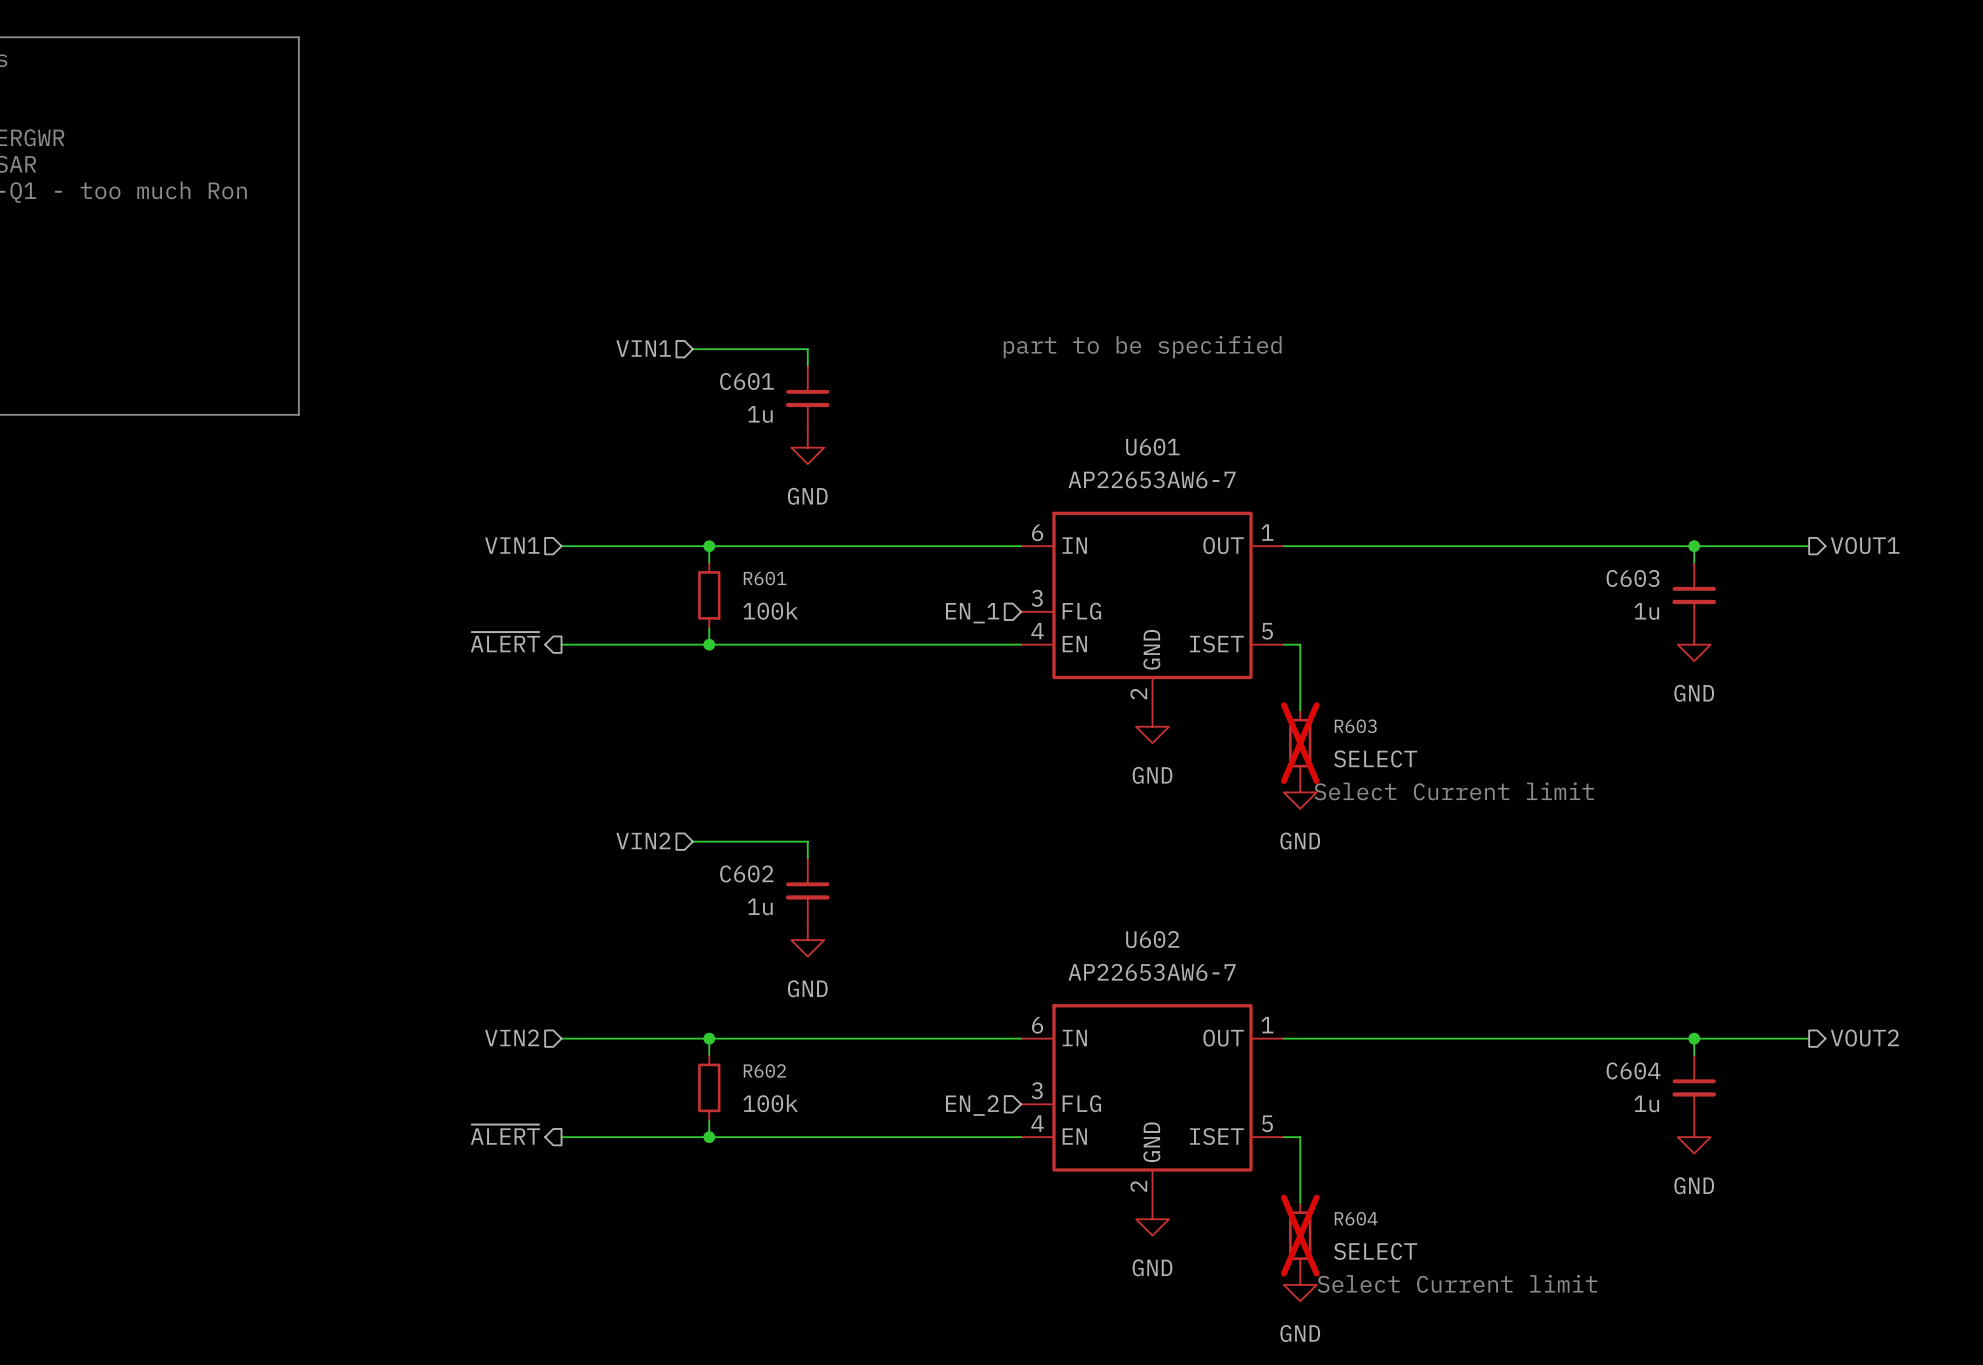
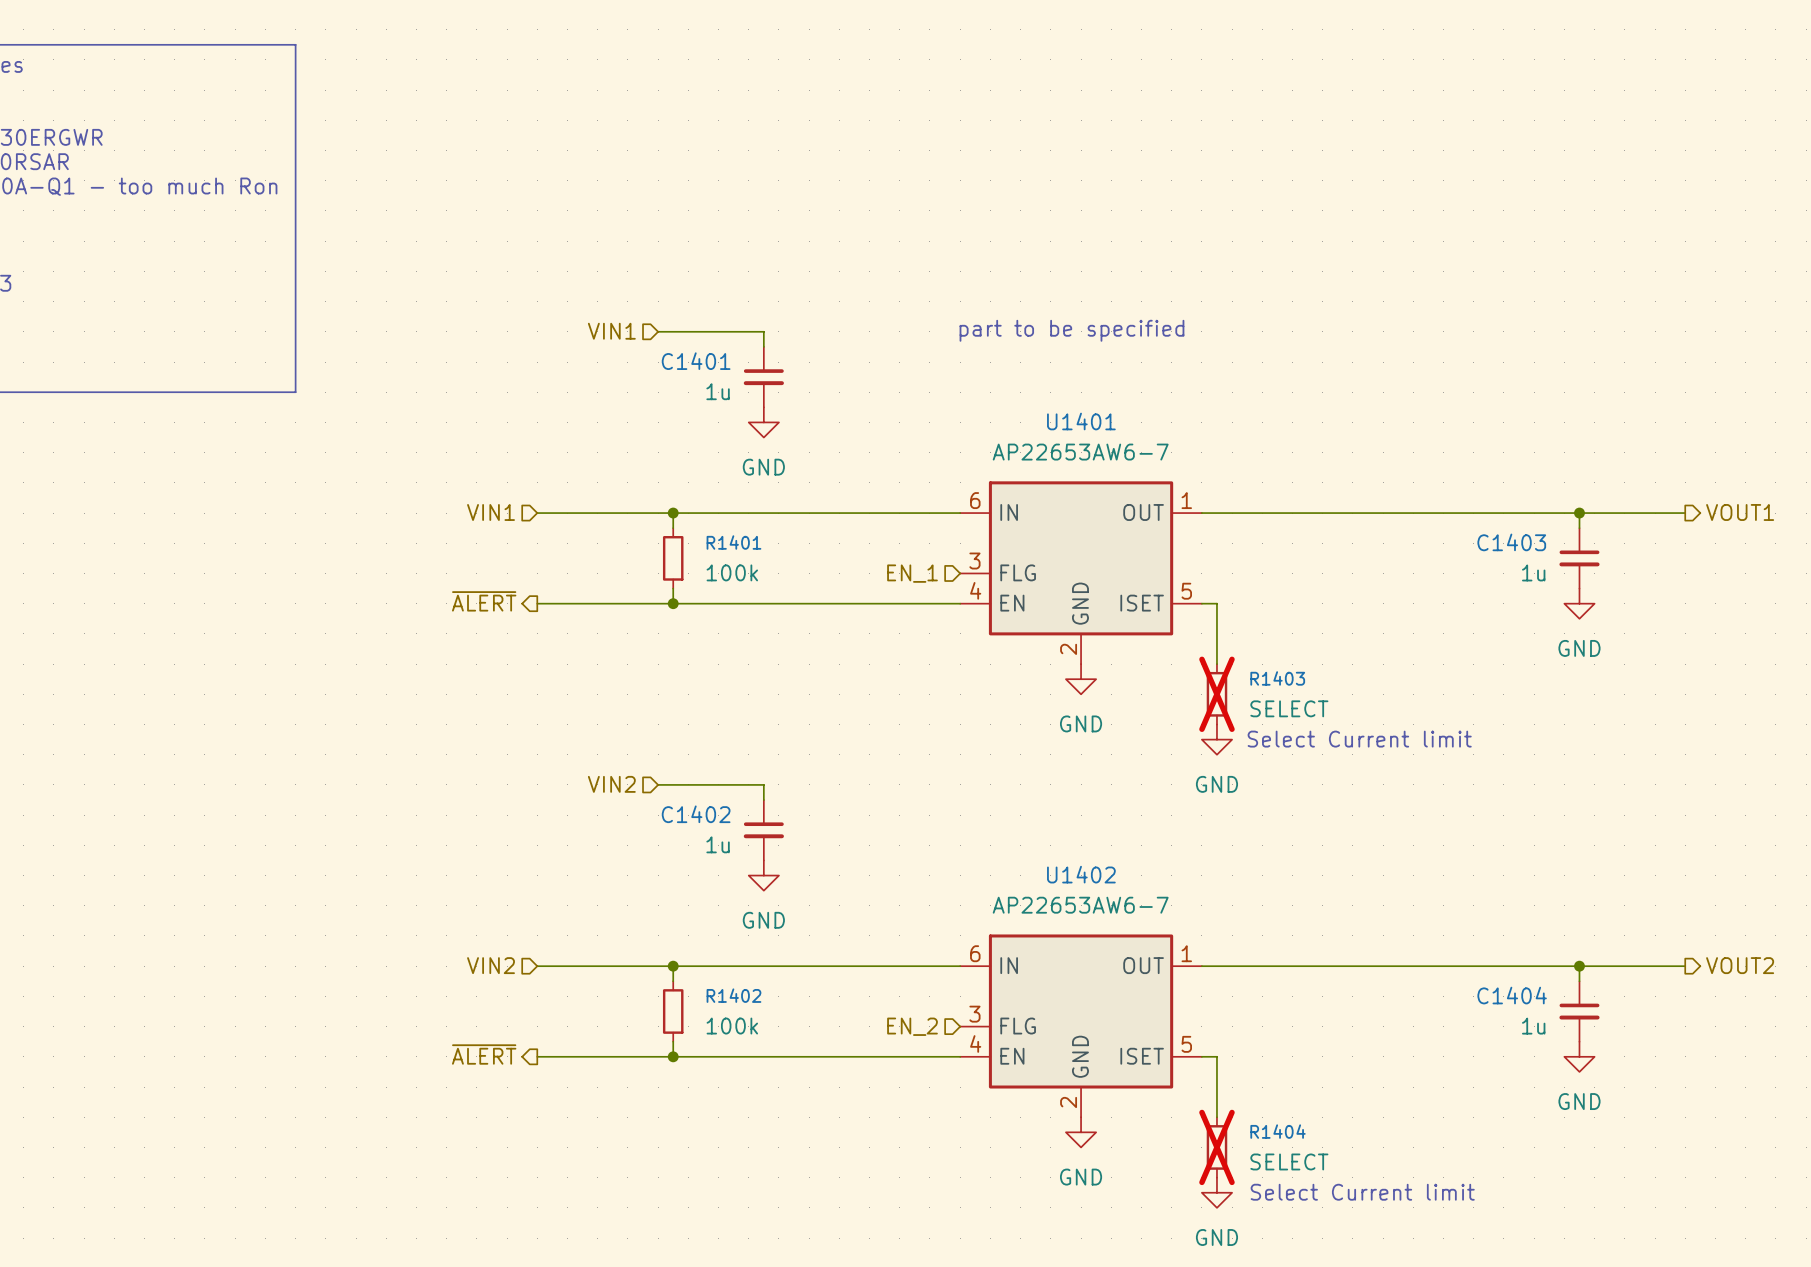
C601 name: C601 (746, 381) -> C1401 (696, 361)
U601 name: U601 (1152, 447) -> U1401 (1081, 421)
R601 name: R601 (765, 578) -> R1401 (733, 542)
C603 name: C603 (1633, 578) -> C1403 (1511, 542)
R603 name: R603 (1355, 726) -> R1403 (1277, 678)
C602 name: C602 (746, 873) -> C1402 (696, 814)
U602 name: U602 (1152, 939) -> U1402 (1081, 874)
R602 name: R602 (764, 1070) -> R1402 (733, 995)
C604 name: C604 (1633, 1070) -> C1404 (1512, 995)
R604 name: R604 (1356, 1218) -> R1404 (1278, 1131)

